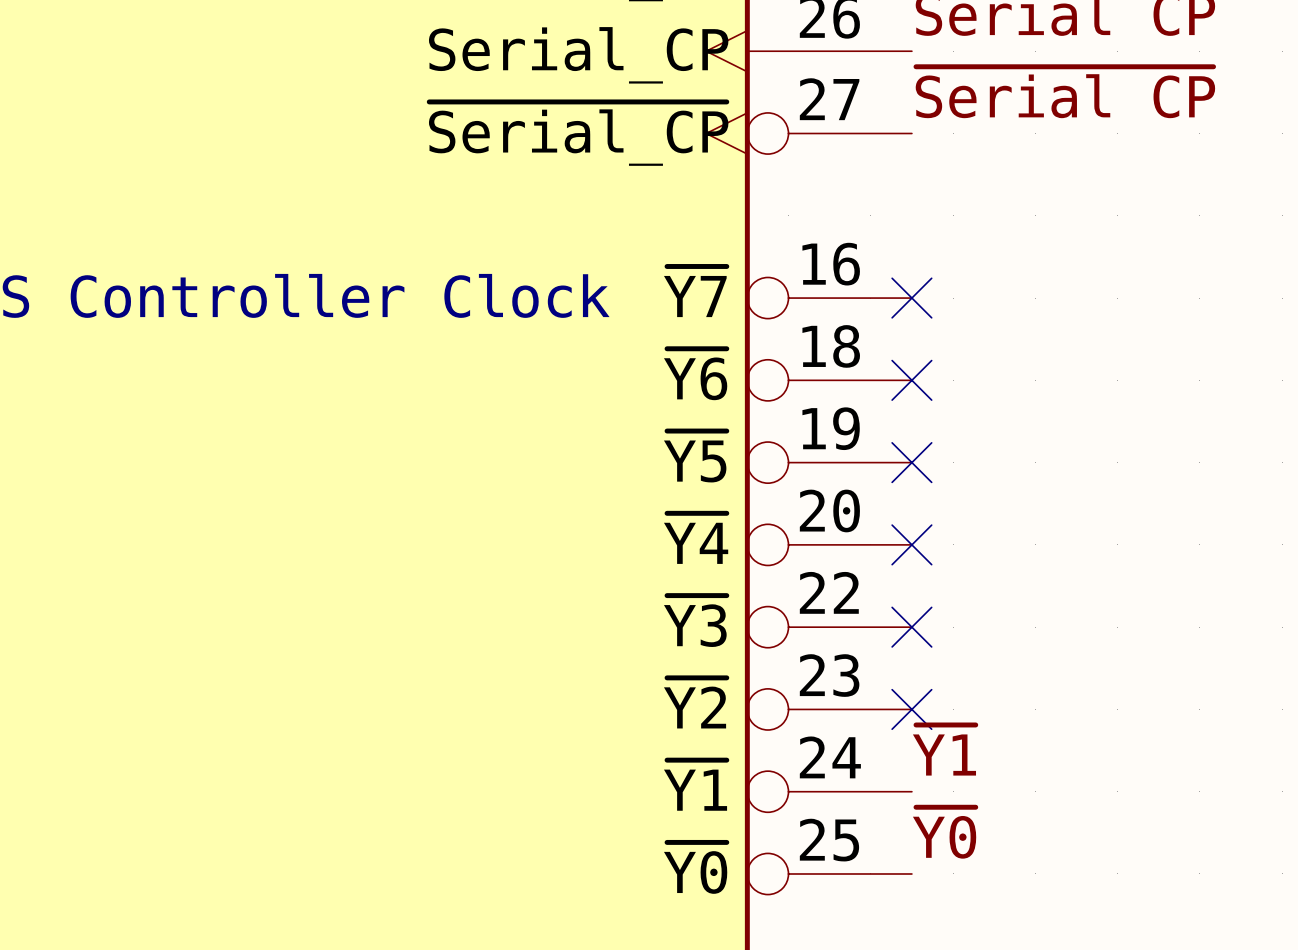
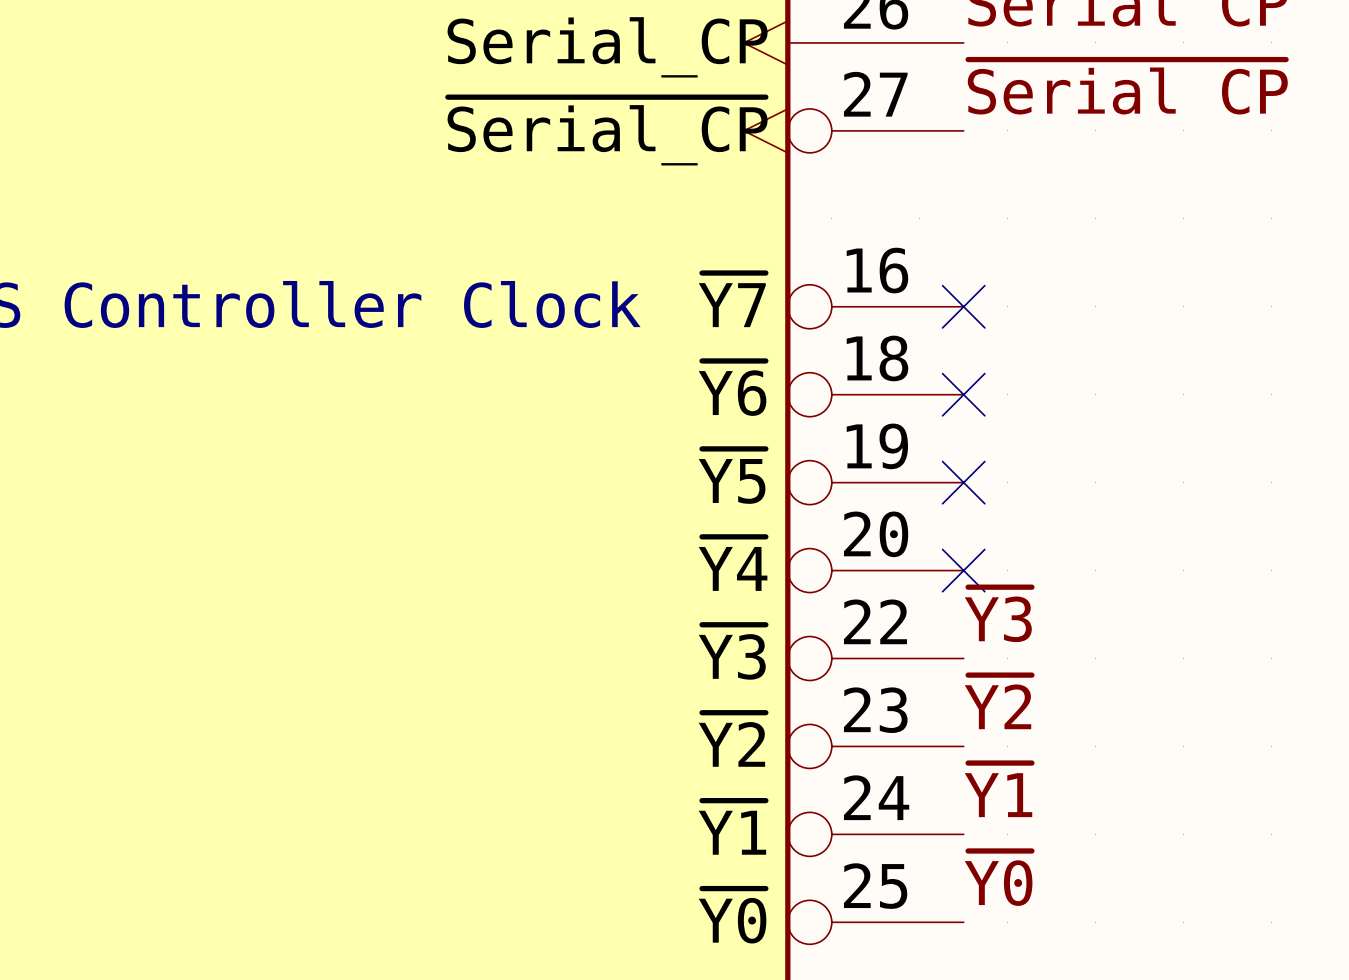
label: none -> ~{Y3} (998, 614)
no-connect mark: (911, 627) -> none
label: none -> ~{Y2} (998, 702)
no-connect mark: (911, 709) -> none

